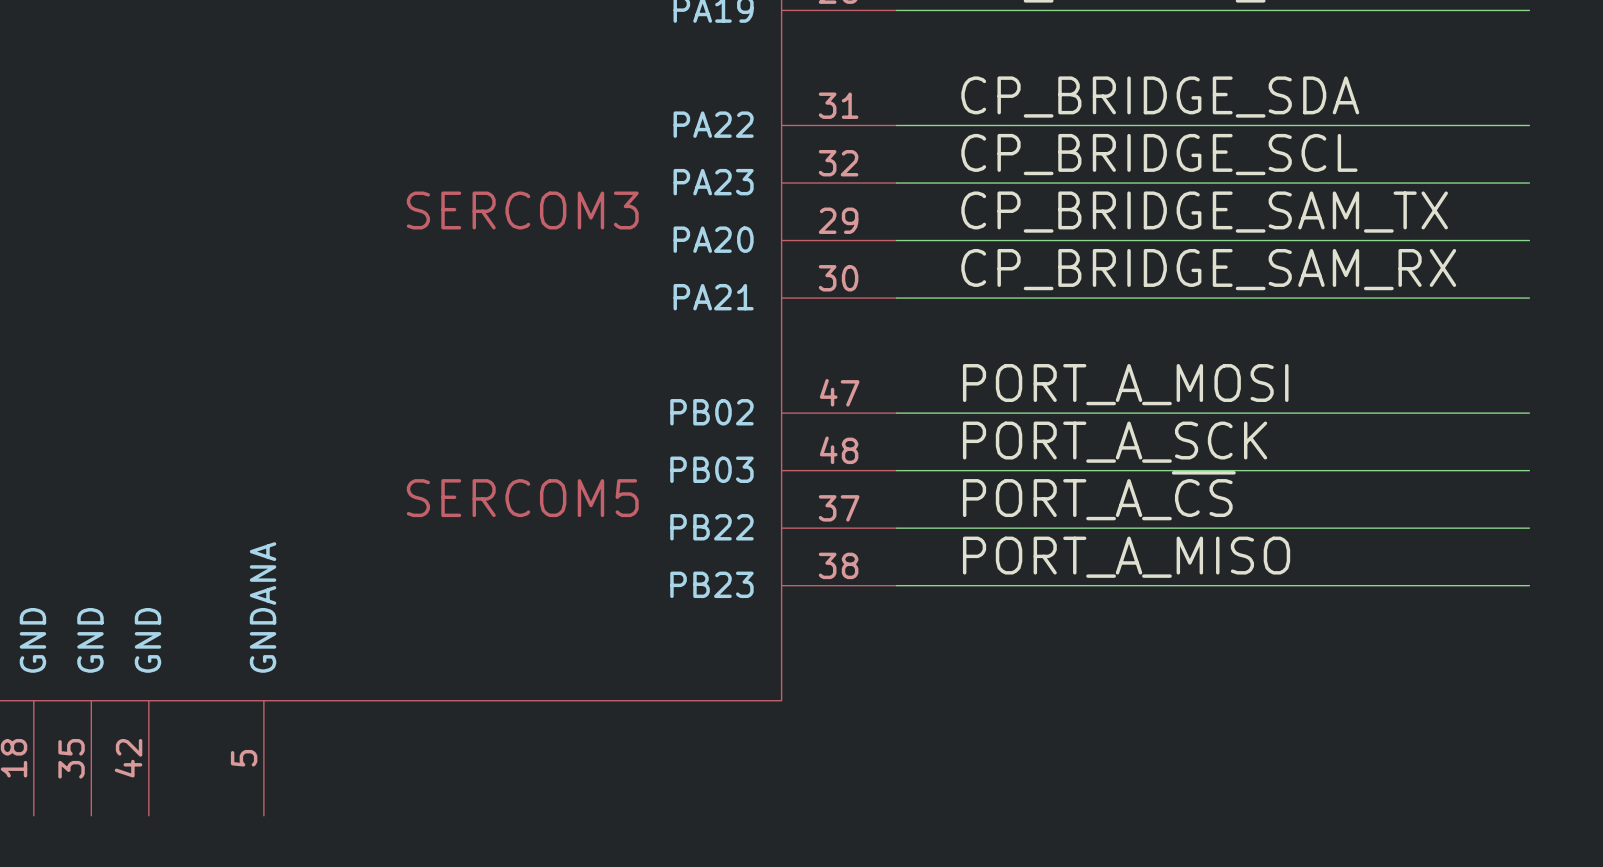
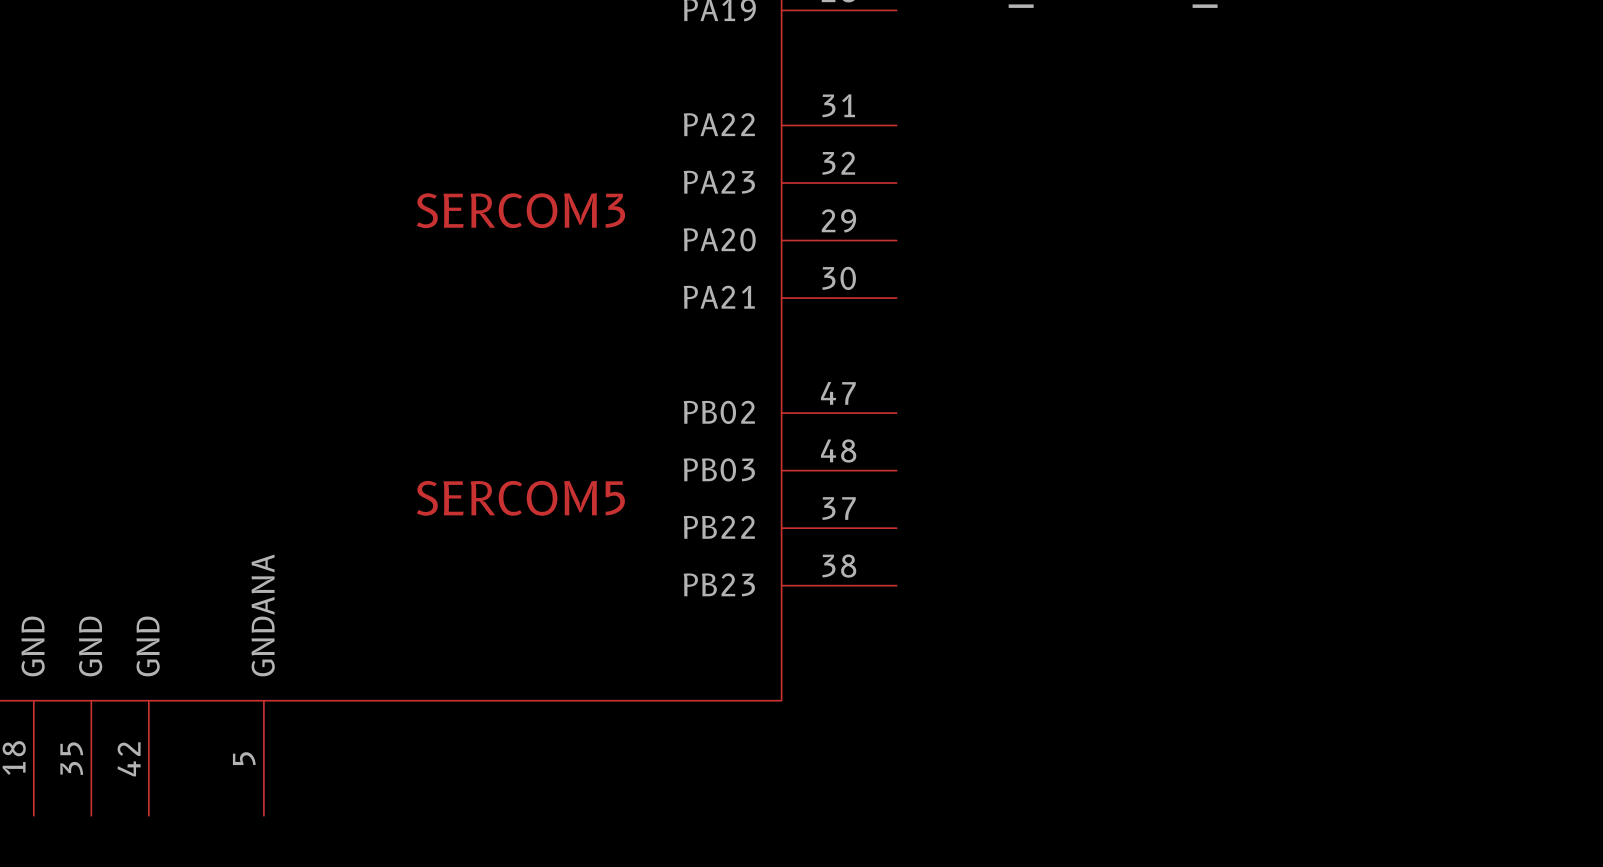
wire: (896, 10) (1529, 10) -> none
label: CP_BRIDGE_SDA (1160, 97) -> none
wire: (896, 125) (1529, 125) -> none
label: CP_BRIDGE_SCL (1159, 154) -> none
wire: (896, 183) (1529, 183) -> none
label: CP_BRIDGE_SAM_TX (1204, 212) -> none
wire: (896, 240) (1529, 240) -> none
label: CP_BRIDGE_SAM_RX (1208, 269) -> none
wire: (896, 298) (1529, 298) -> none
label: PORT_A_MOSI (1125, 384) -> none
wire: (896, 413) (1529, 413) -> none
label: PORT_A_SCK (1115, 442) -> none
wire: (896, 470) (1529, 470) -> none
label: PORT_A_~{CS} (1099, 495) -> none
wire: (896, 528) (1529, 528) -> none
label: PORT_A_MISO (1126, 557) -> none
wire: (896, 585) (1529, 585) -> none

